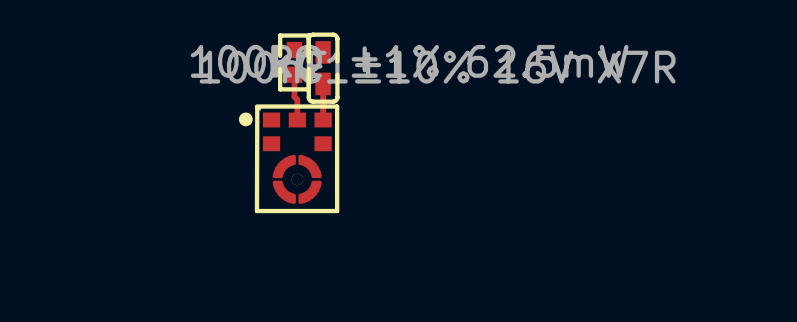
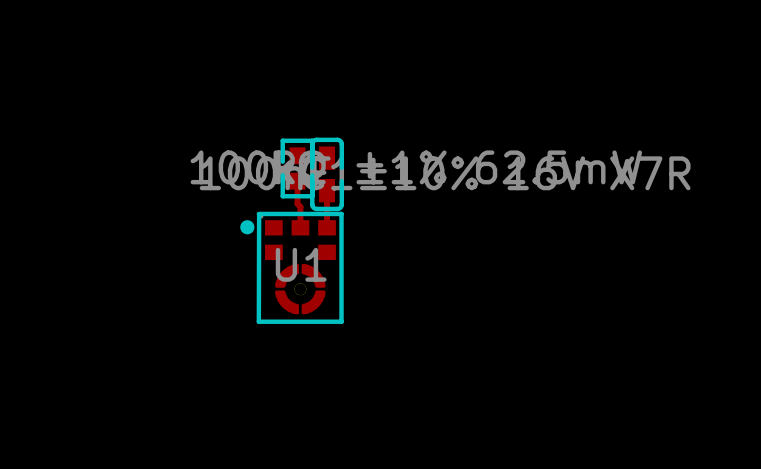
part: (289, 158) -> none
U1: none -> (291, 267)

